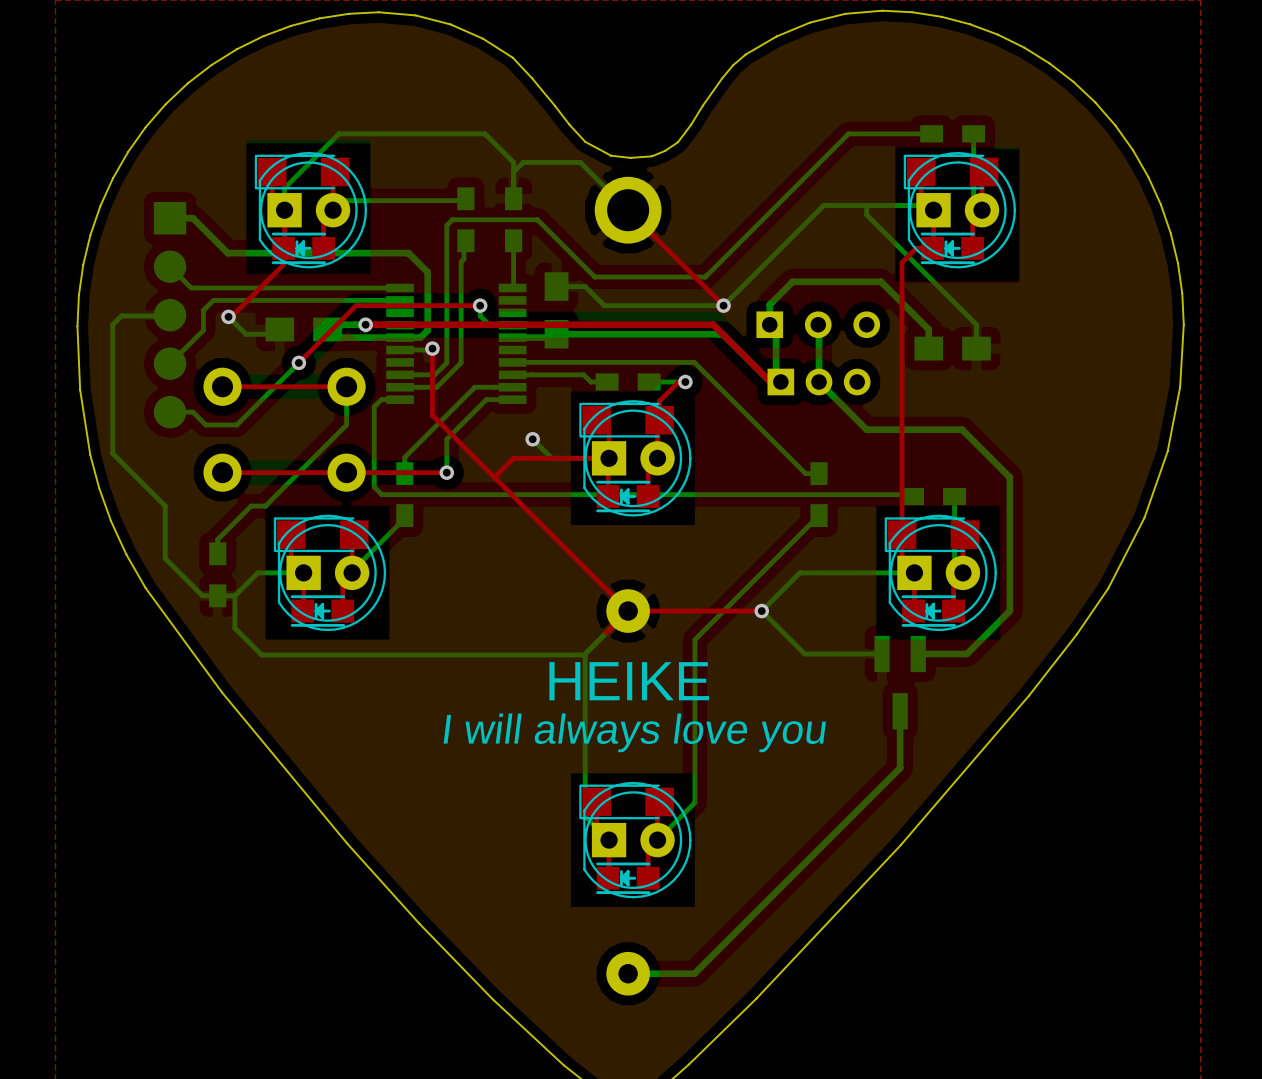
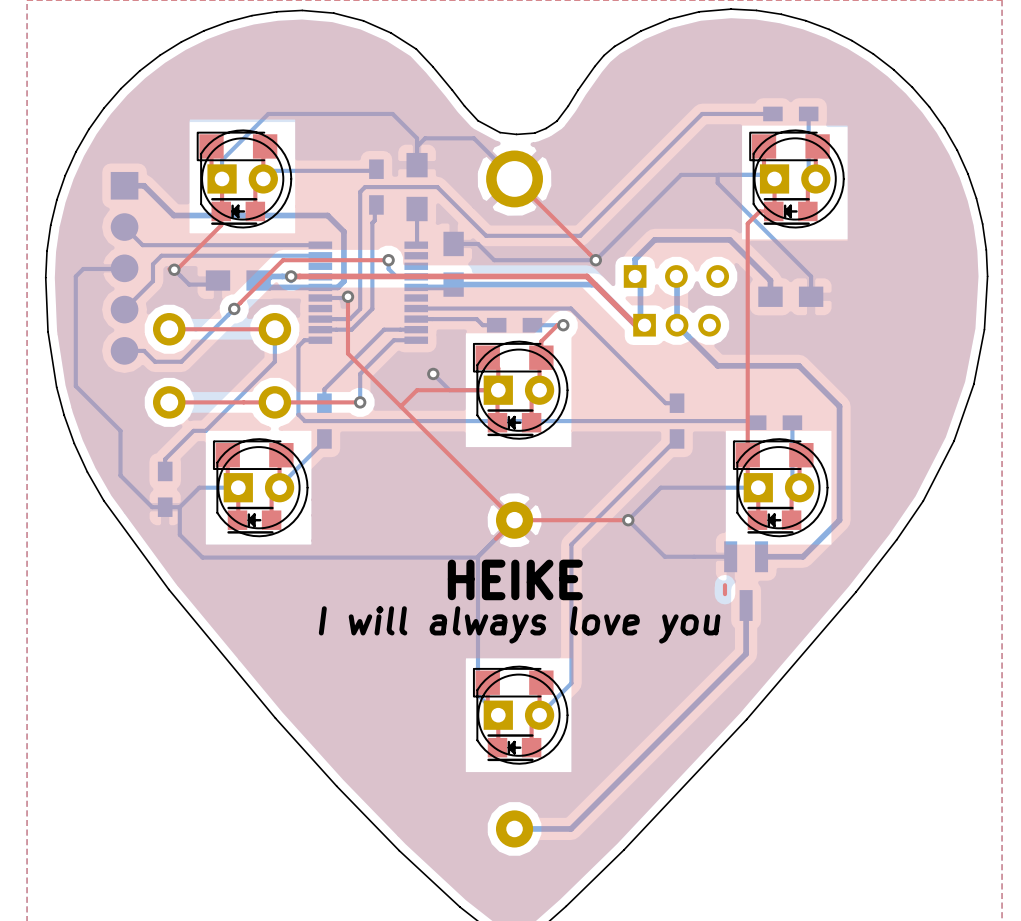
part footprint: [505, 187, 523, 253] -> [406, 152, 428, 222]
top track: none -> (724, 585) (724, 594)

